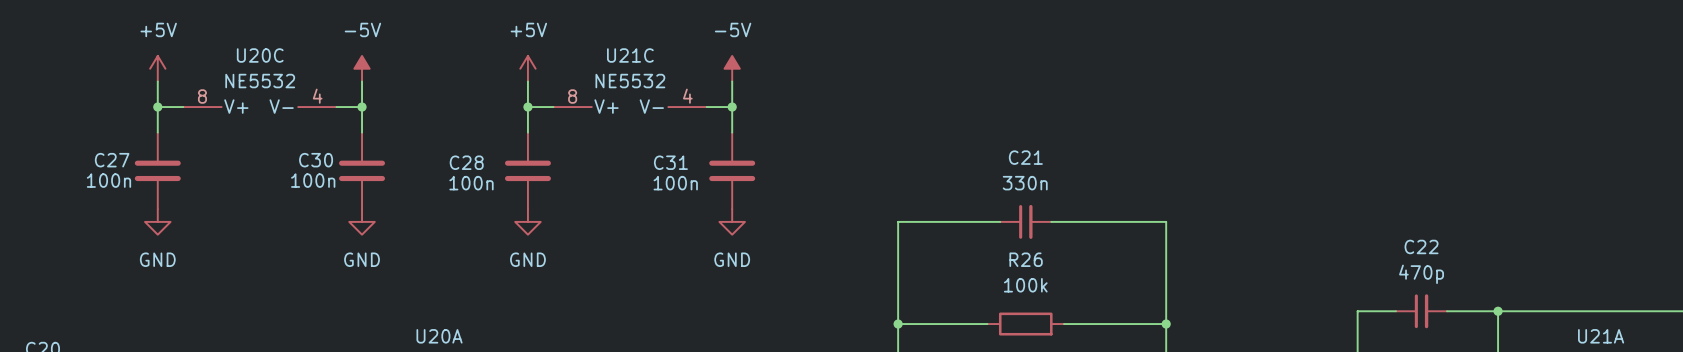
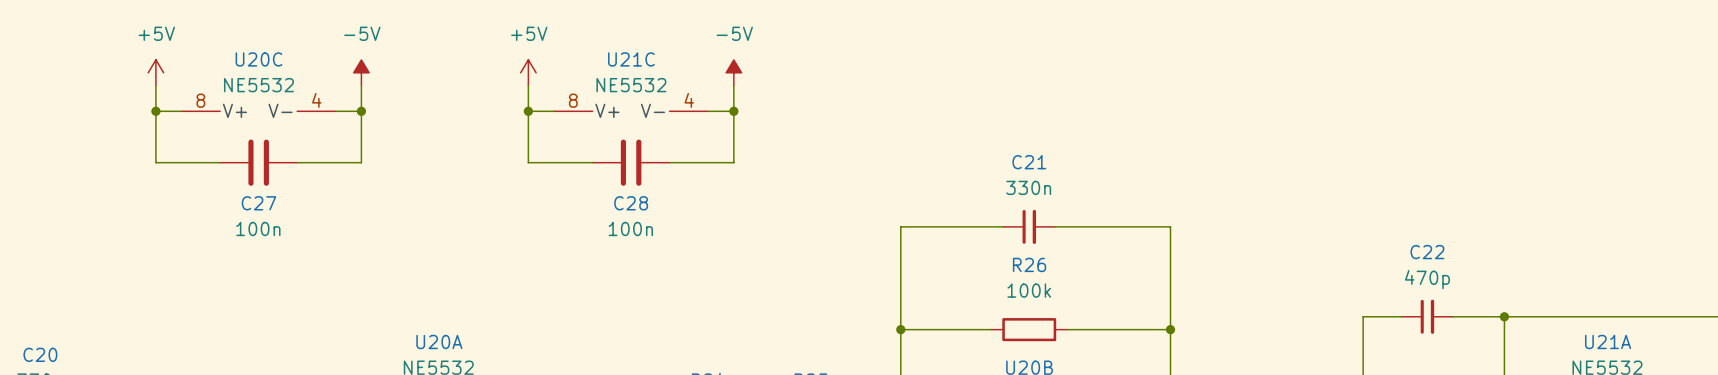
wire: none -> (155, 136) (155, 162) (220, 162)
wire: none -> (361, 136) (361, 162) (297, 162)
wire: none -> (528, 136) (528, 162) (592, 162)
wire: none -> (733, 136) (733, 162) (669, 162)
C27 name position: C27 (112, 160) -> C27 (258, 203)
C28 name position: C28 (466, 162) -> C28 (631, 203)
C27 rotation: 0° (157, 170) -> 90° clockwise (258, 162)
C27 position: (157, 170) -> (258, 162)
C30: 100n (362, 170) -> none
C28 rotation: 0° (527, 170) -> 90° clockwise (631, 162)
C28 position: (527, 170) -> (631, 162)
C31: 100n (732, 170) -> none
C27 value position: 100n (108, 180) -> 100n (258, 228)
C28 value position: 100n (471, 183) -> 100n (630, 228)
power symbol: GND (157, 221) -> none
power symbol: GND (362, 221) -> none
power symbol: GND (527, 221) -> none
power symbol: GND (732, 221) -> none

